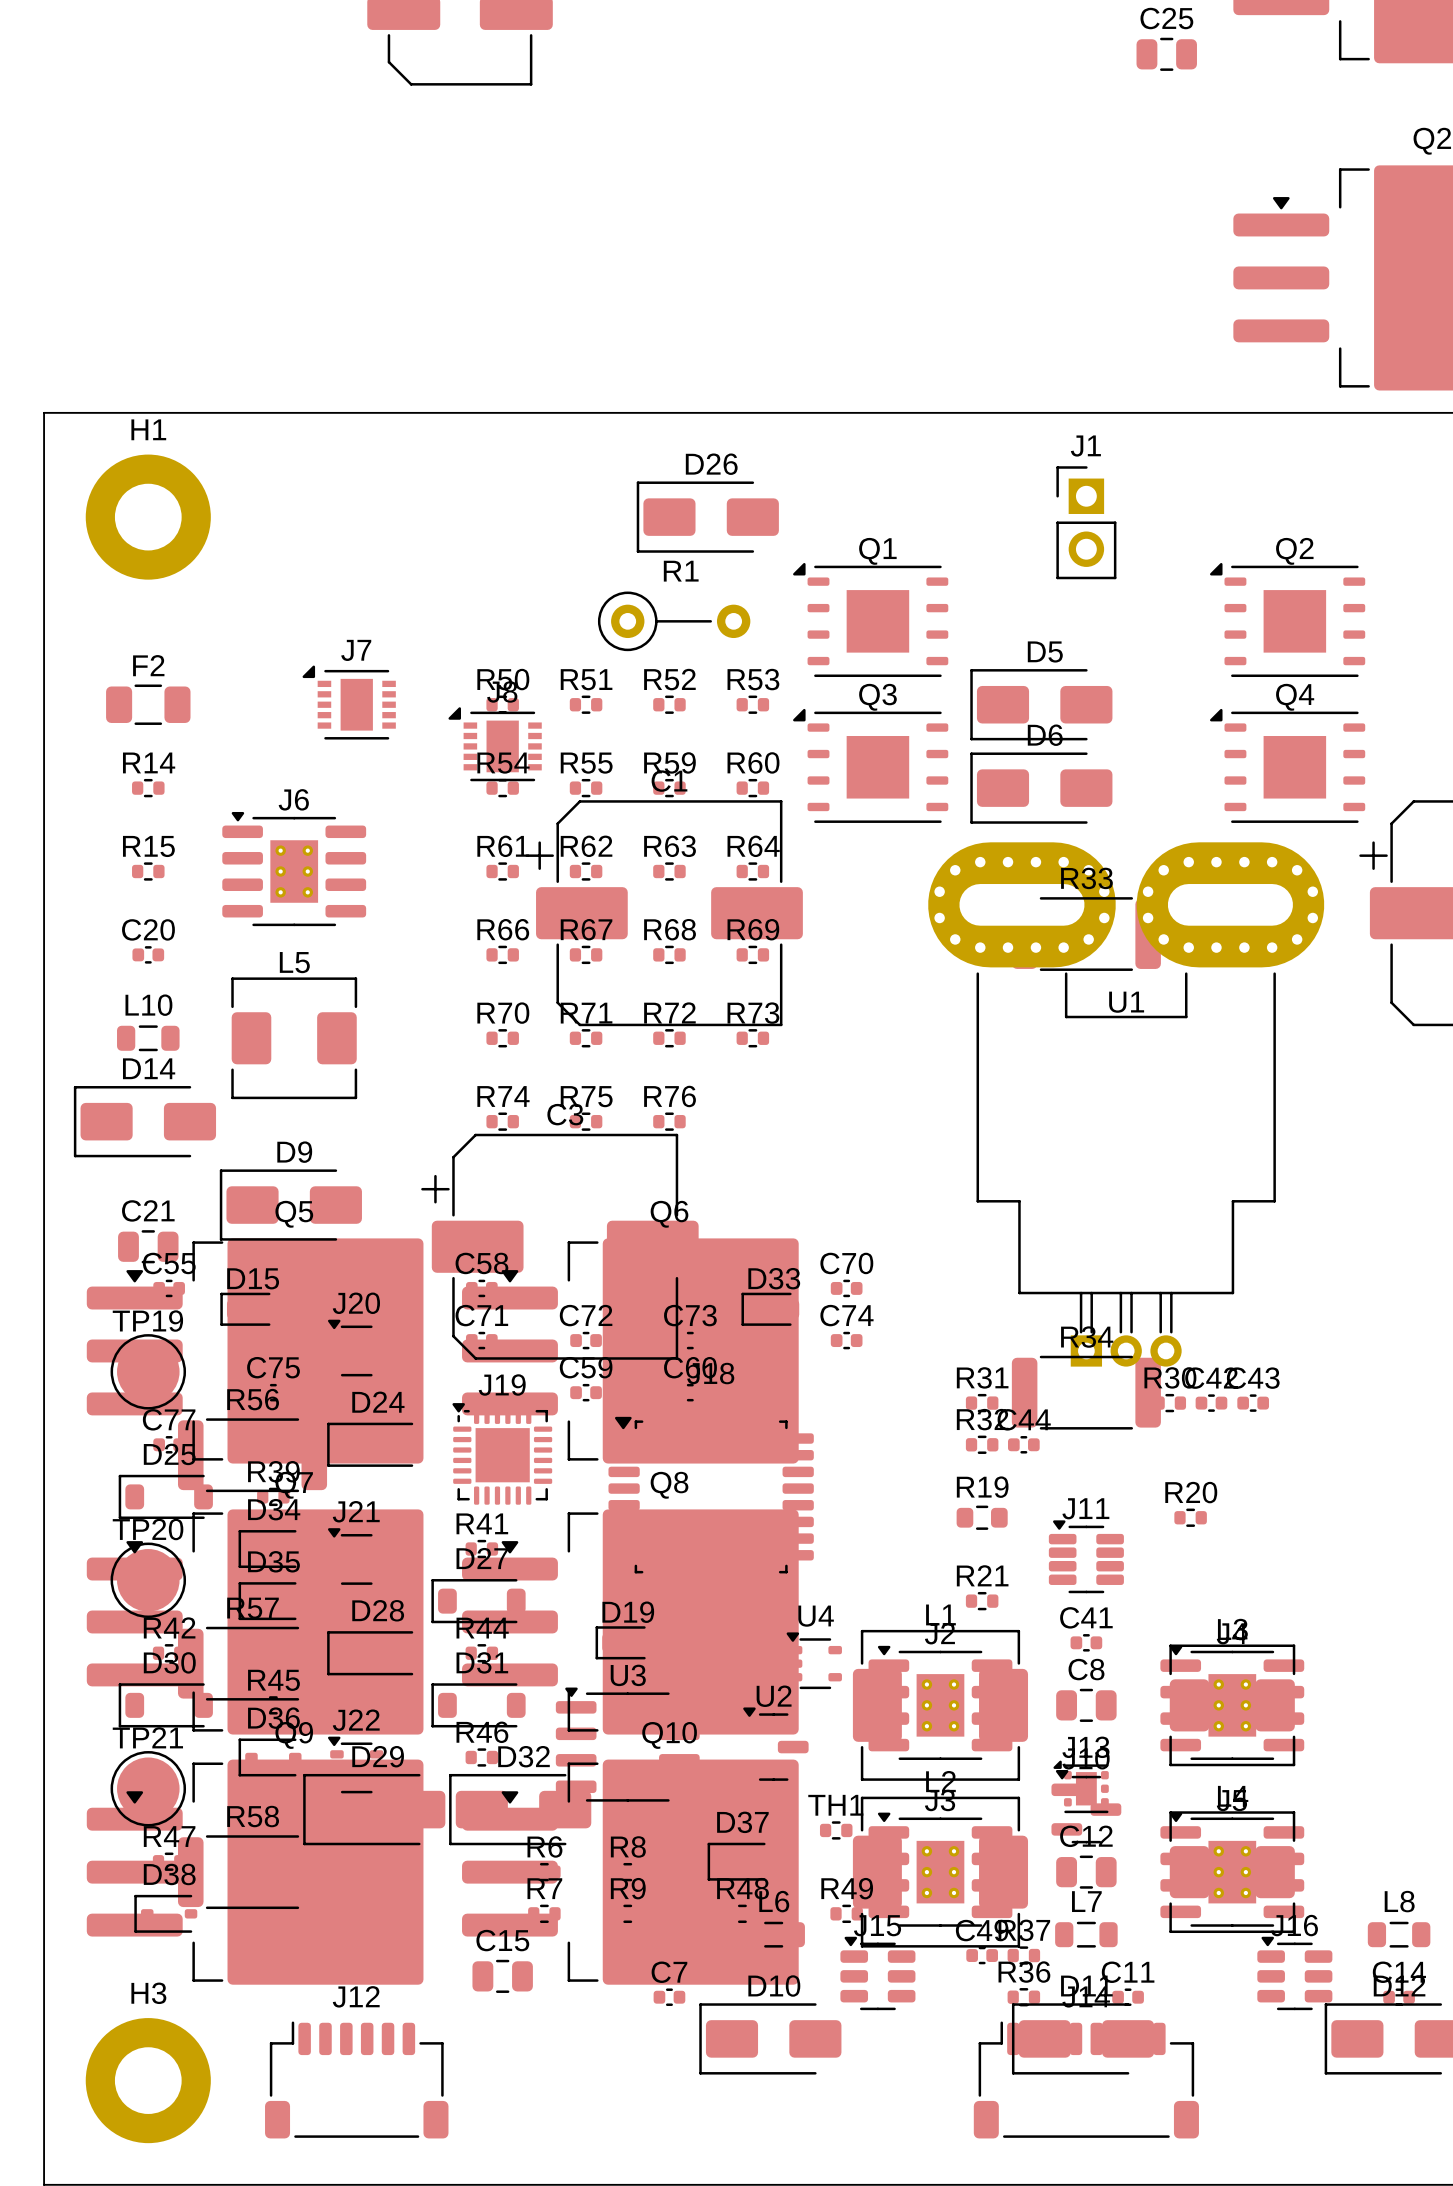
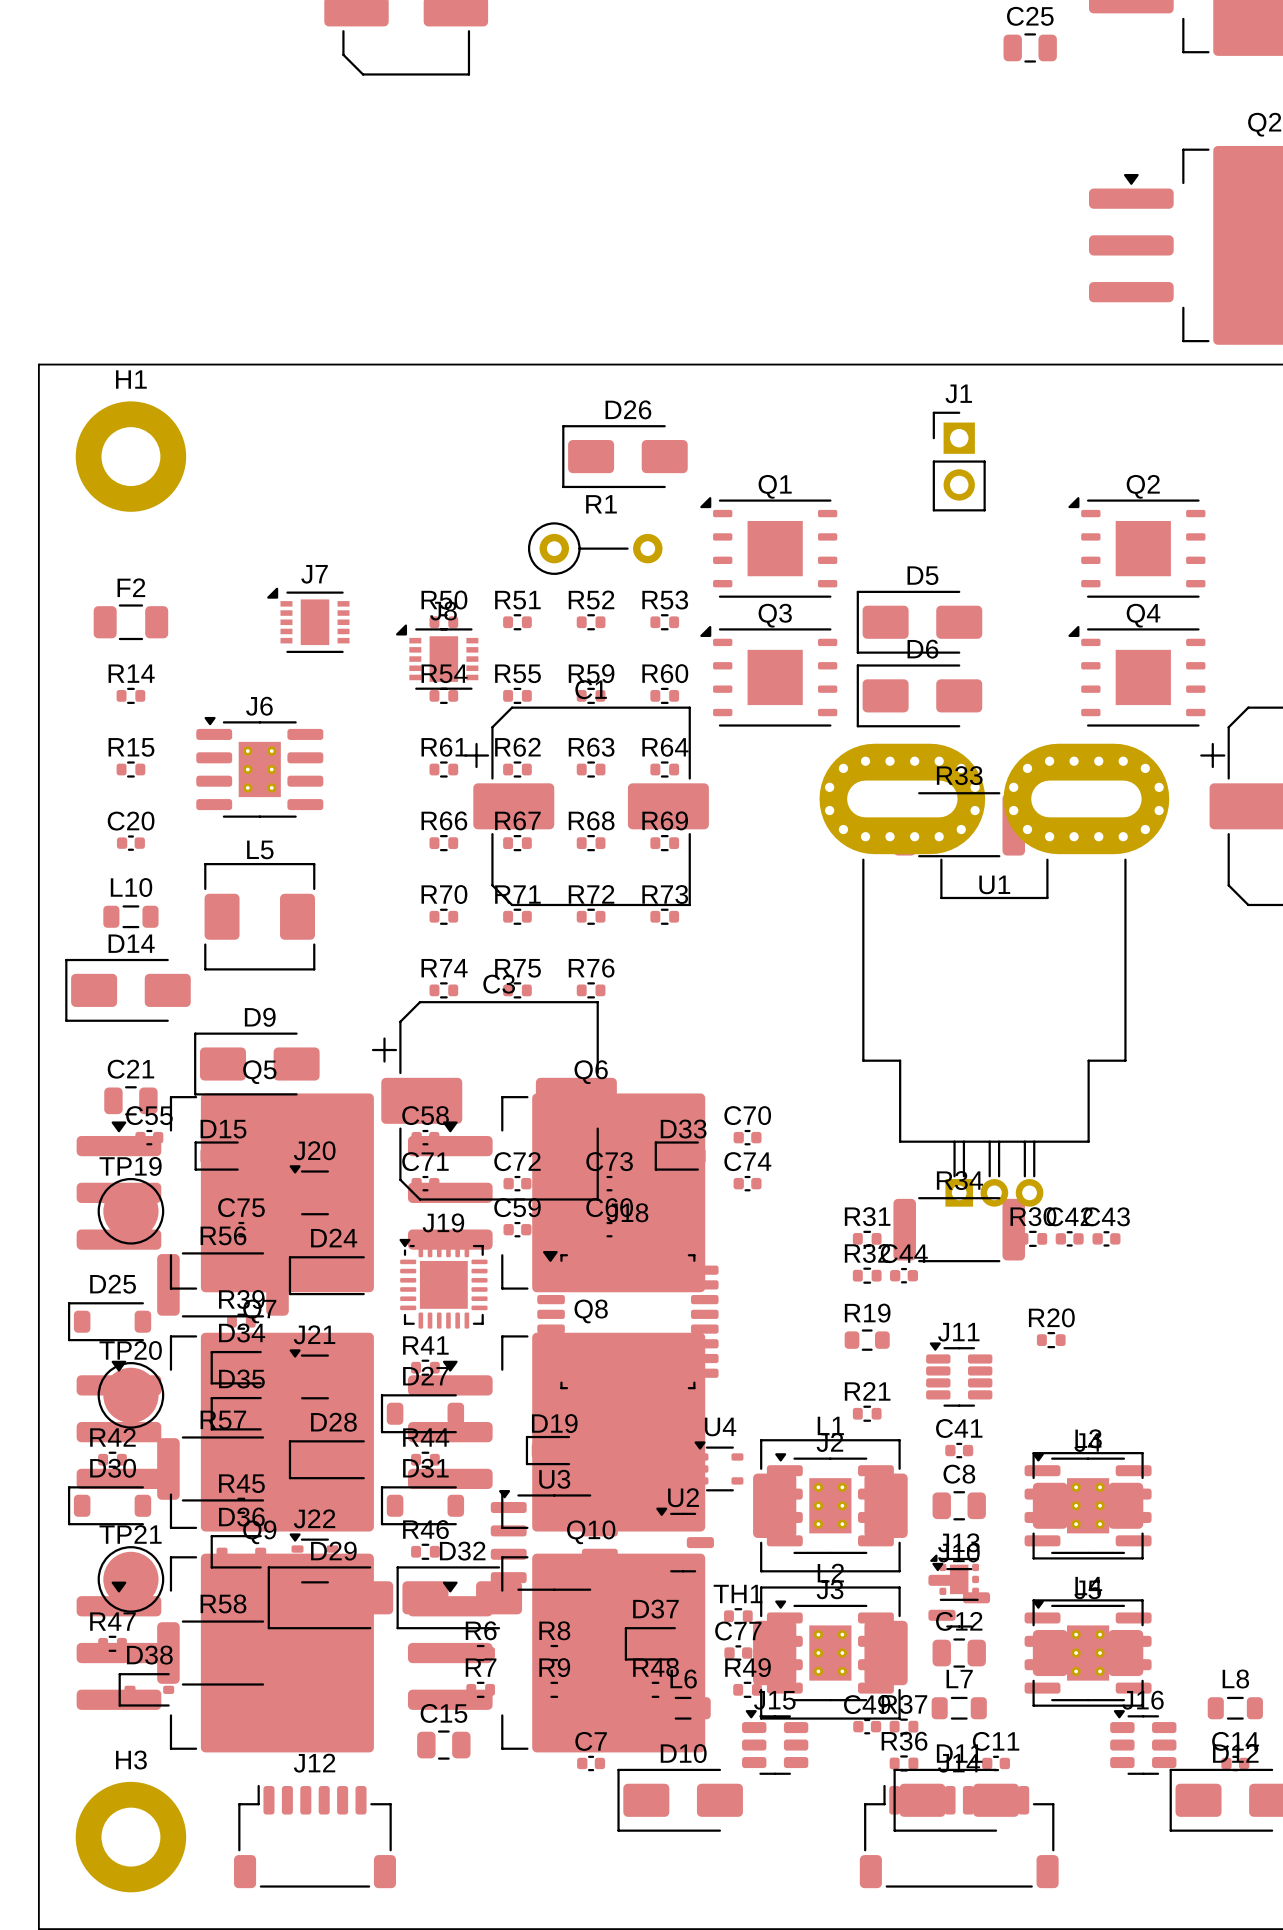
C77 position: (169, 1444) -> (738, 1653)
D25 position: (165, 1496) -> (109, 1321)
R42 position: (169, 1653) -> (112, 1459)
D30 position: (165, 1705) -> (109, 1505)
R47 position: (169, 1861) -> (112, 1643)

